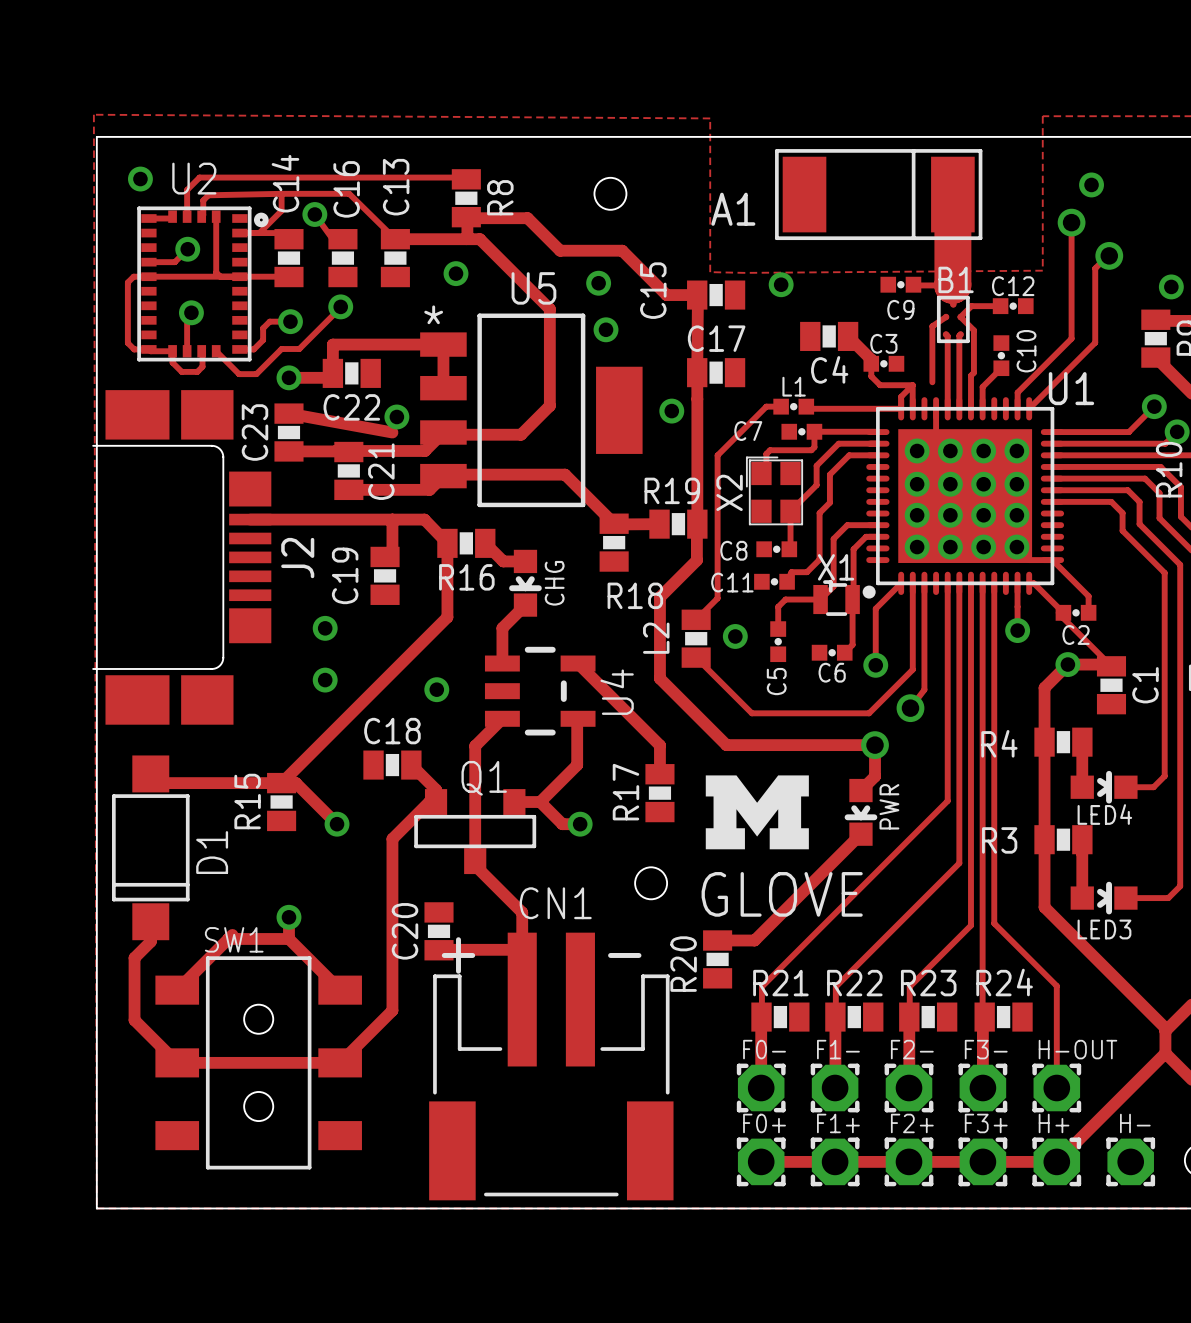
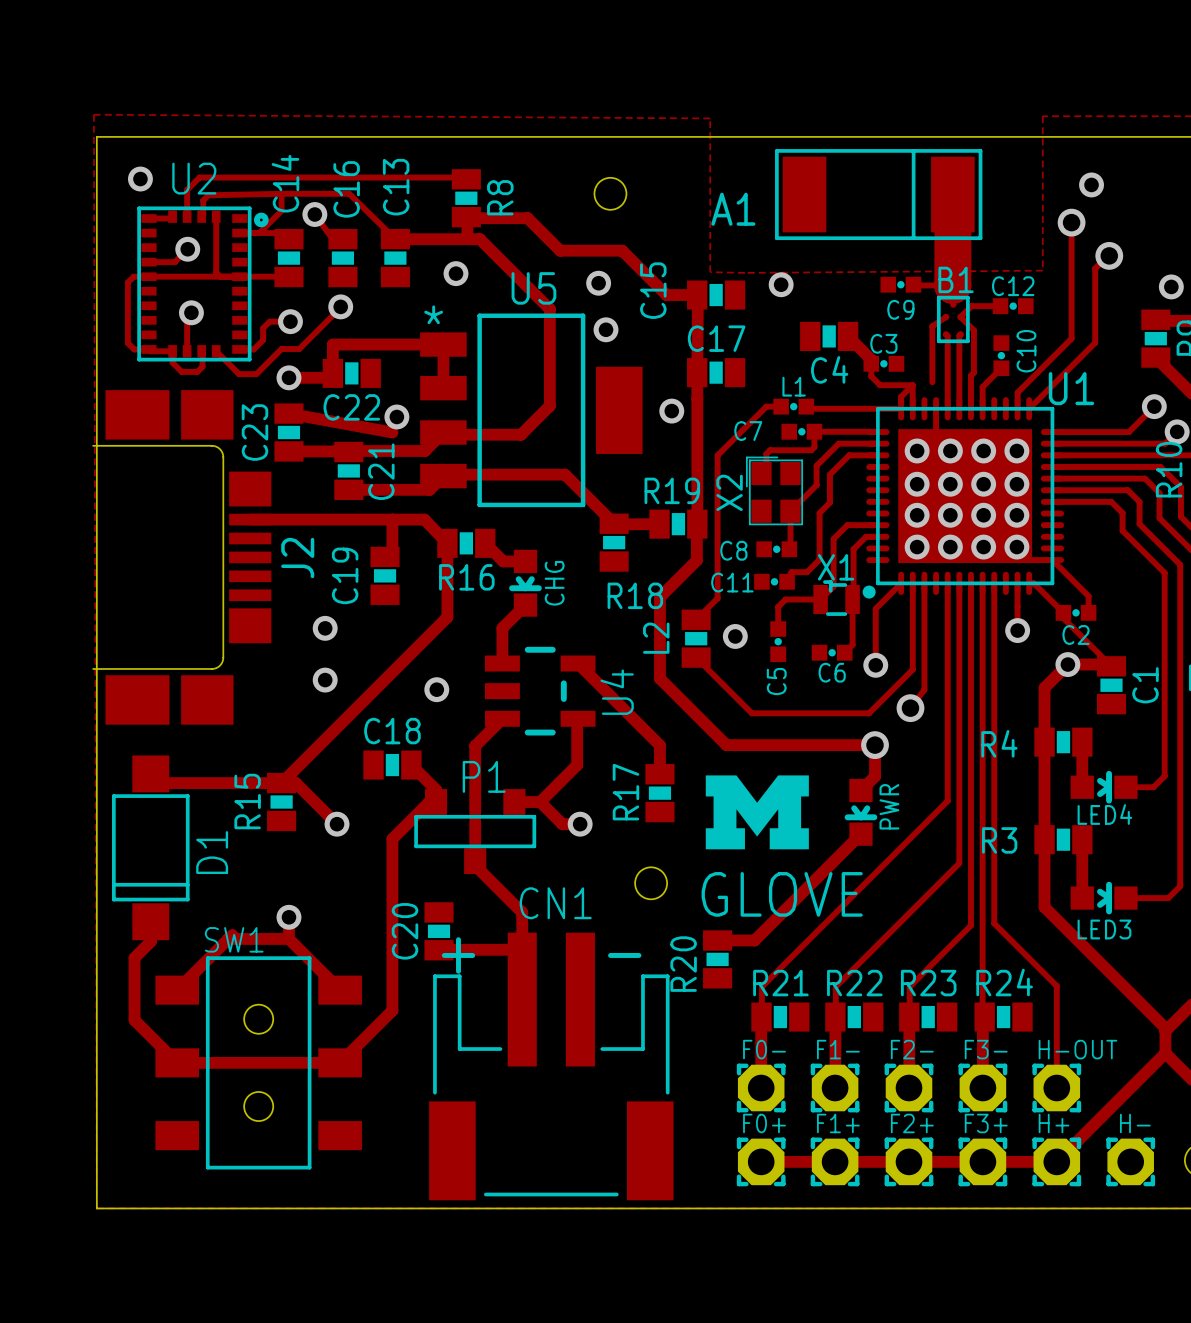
Q1 name: Q1 (484, 778) -> P1 (484, 776)

